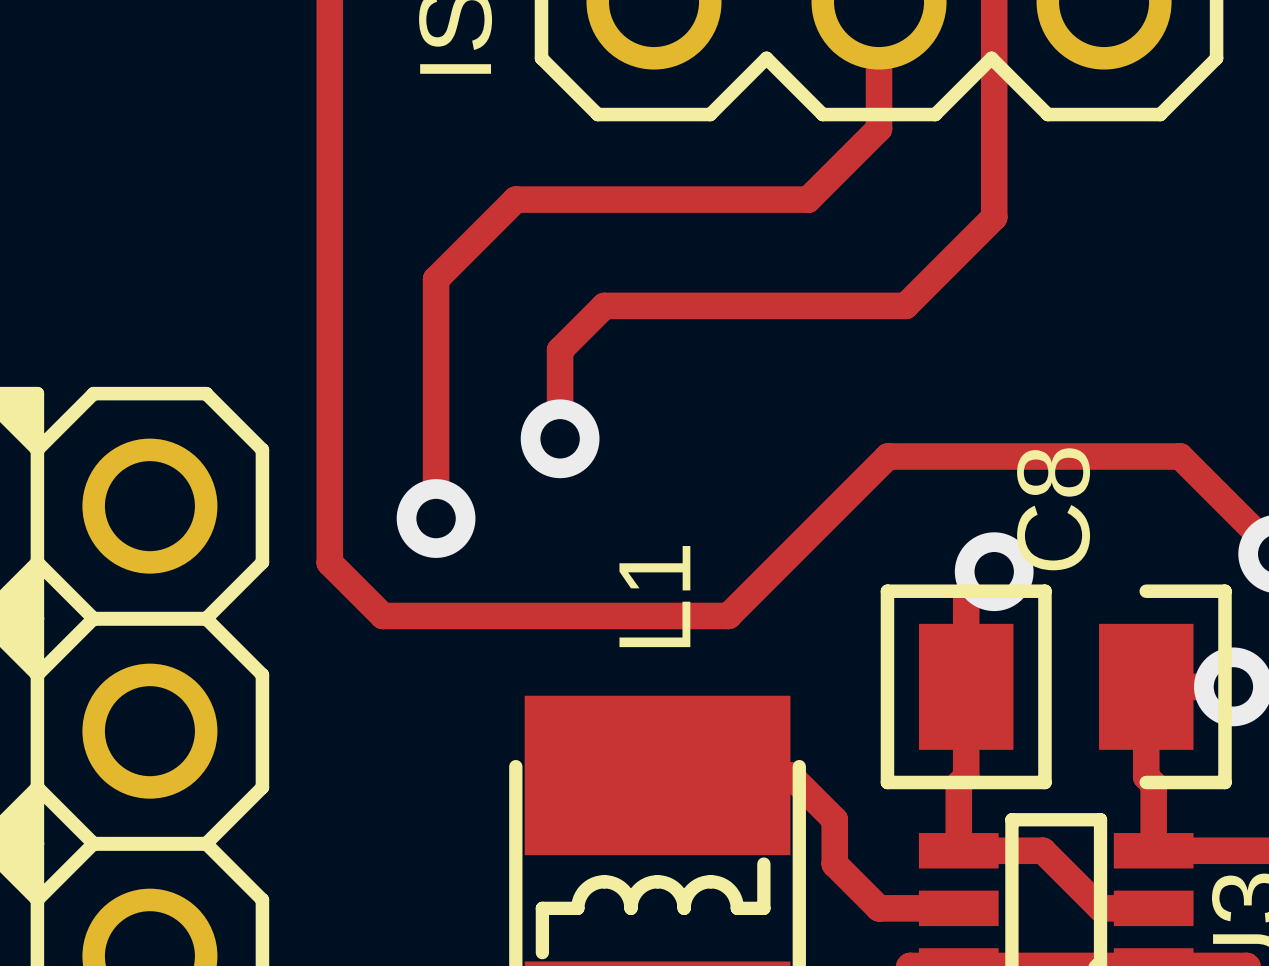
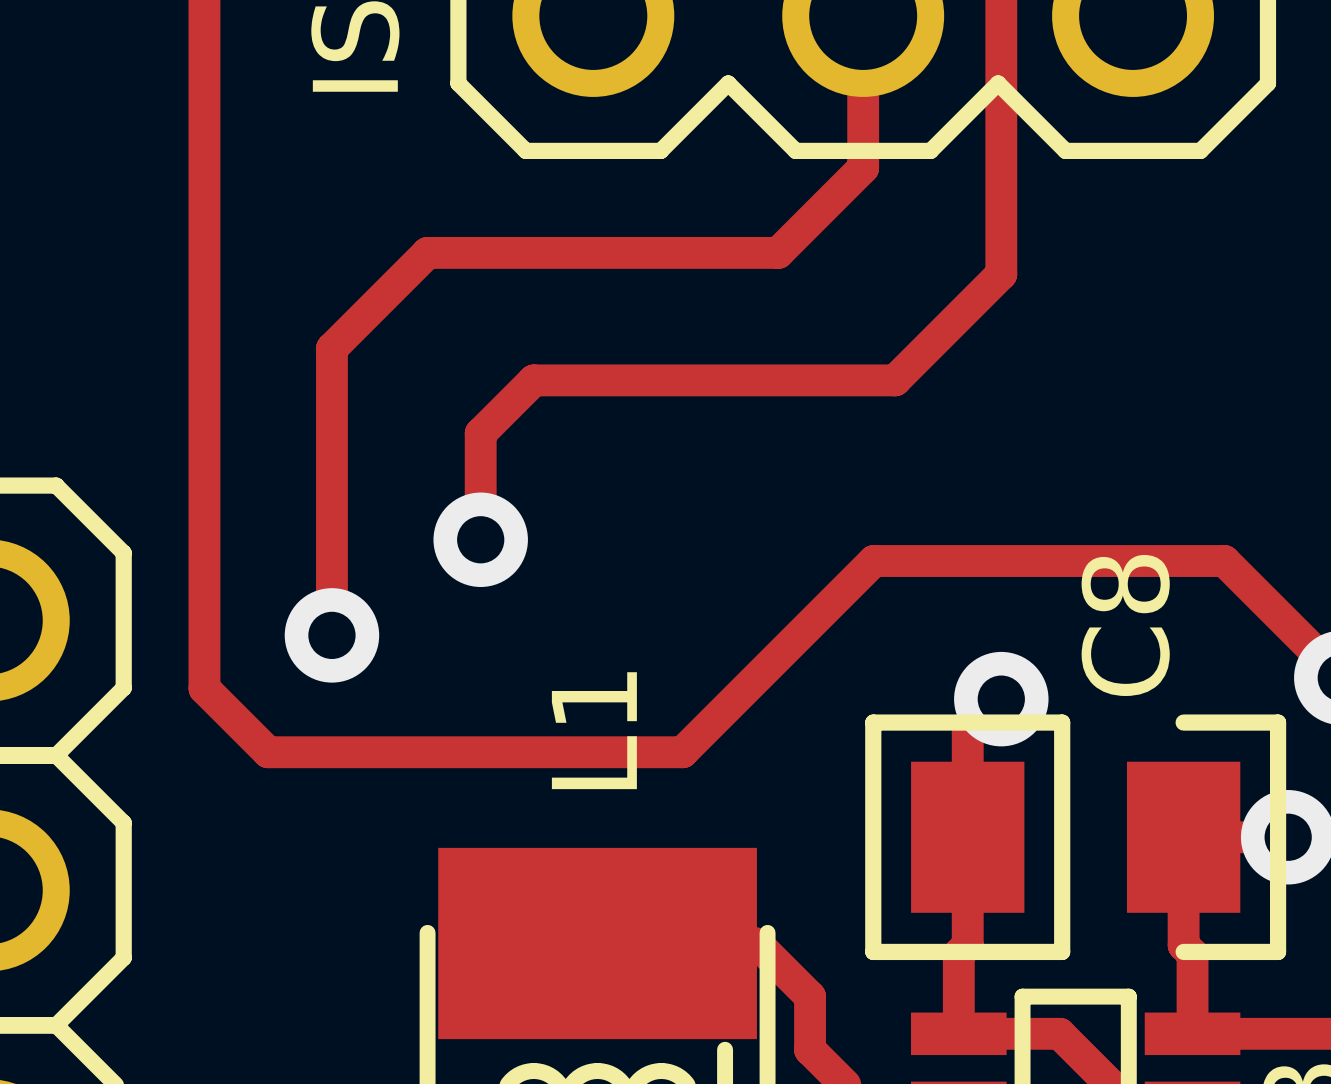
C8 name position: C8 (1053, 509) -> C8 (1125, 625)

